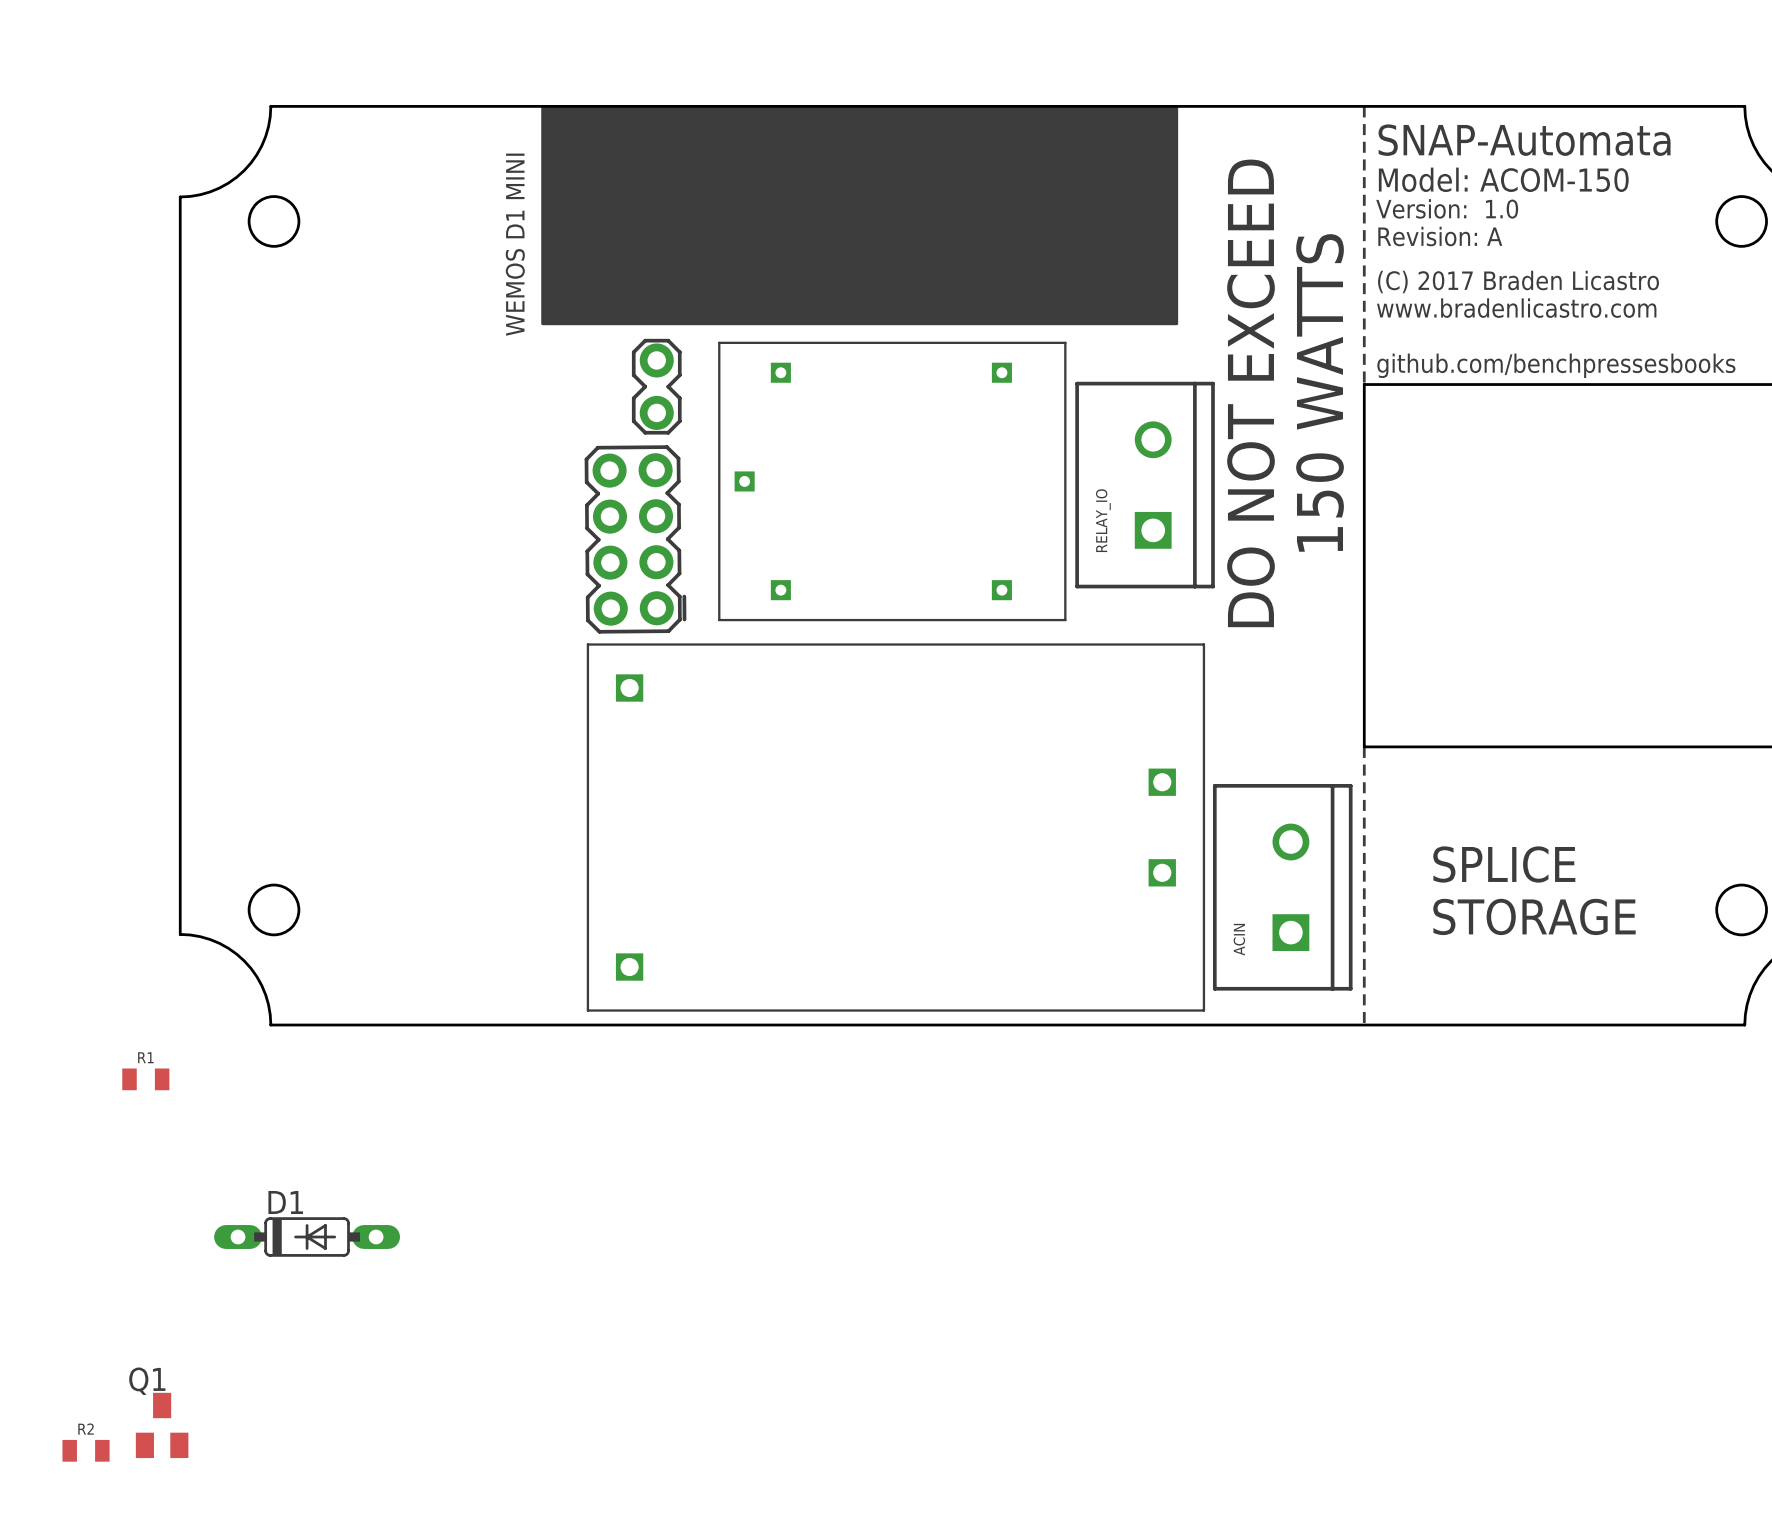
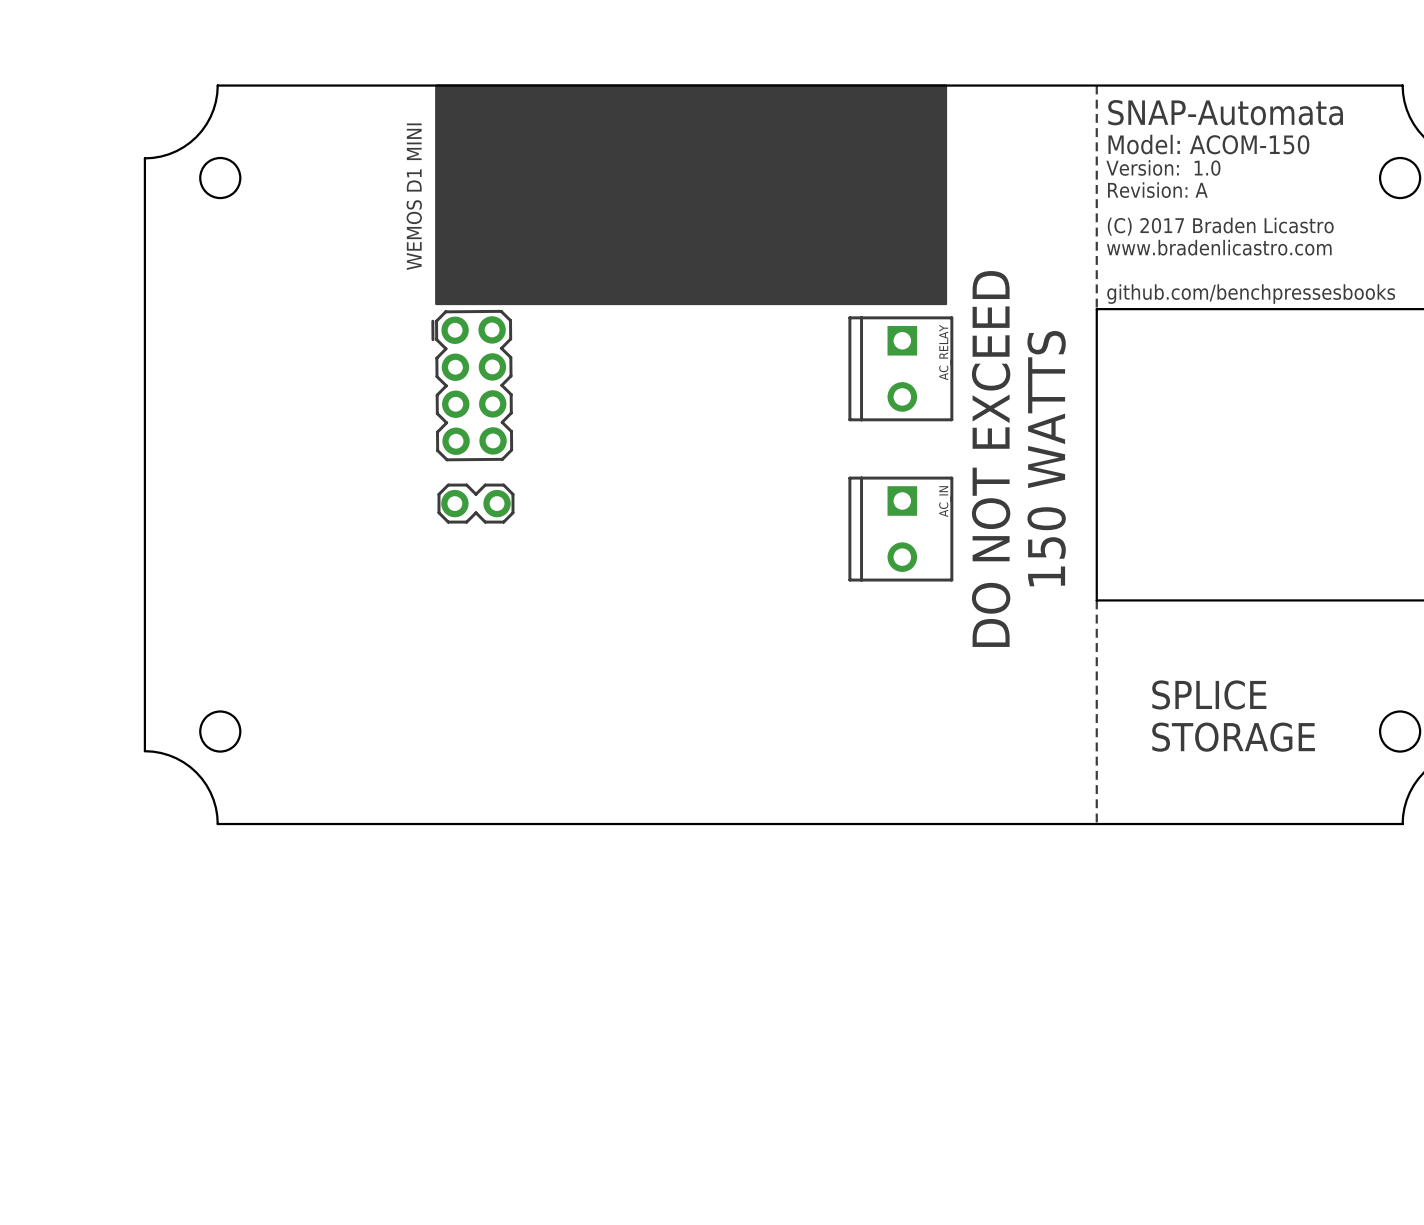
drawing: [541, 105, 1179, 326] -> none
drawing: none -> [435, 84, 948, 306]
part rotation: 0° (656, 386) -> 90° clockwise (475, 503)
part position: (656, 386) -> (475, 503)
text position: 150 WATTS (1320, 392) -> 150 WATTS (1046, 458)
text position: DO NOT EXCEED (1250, 393) -> DO NOT EXCEED (991, 458)
AC_RELAY: none -> (900, 368)
part: (892, 481) -> none
RELAY_IO: (1145, 485) -> none
part rotation: 0° (635, 539) -> 180° (472, 385)
AC_IN: none -> (900, 529)
part: (895, 827) -> none
ACIN: (1282, 887) -> none
R1: (145, 1079) -> none
D1: (307, 1237) -> none
Q1: (162, 1425) -> none
R2: (86, 1450) -> none

